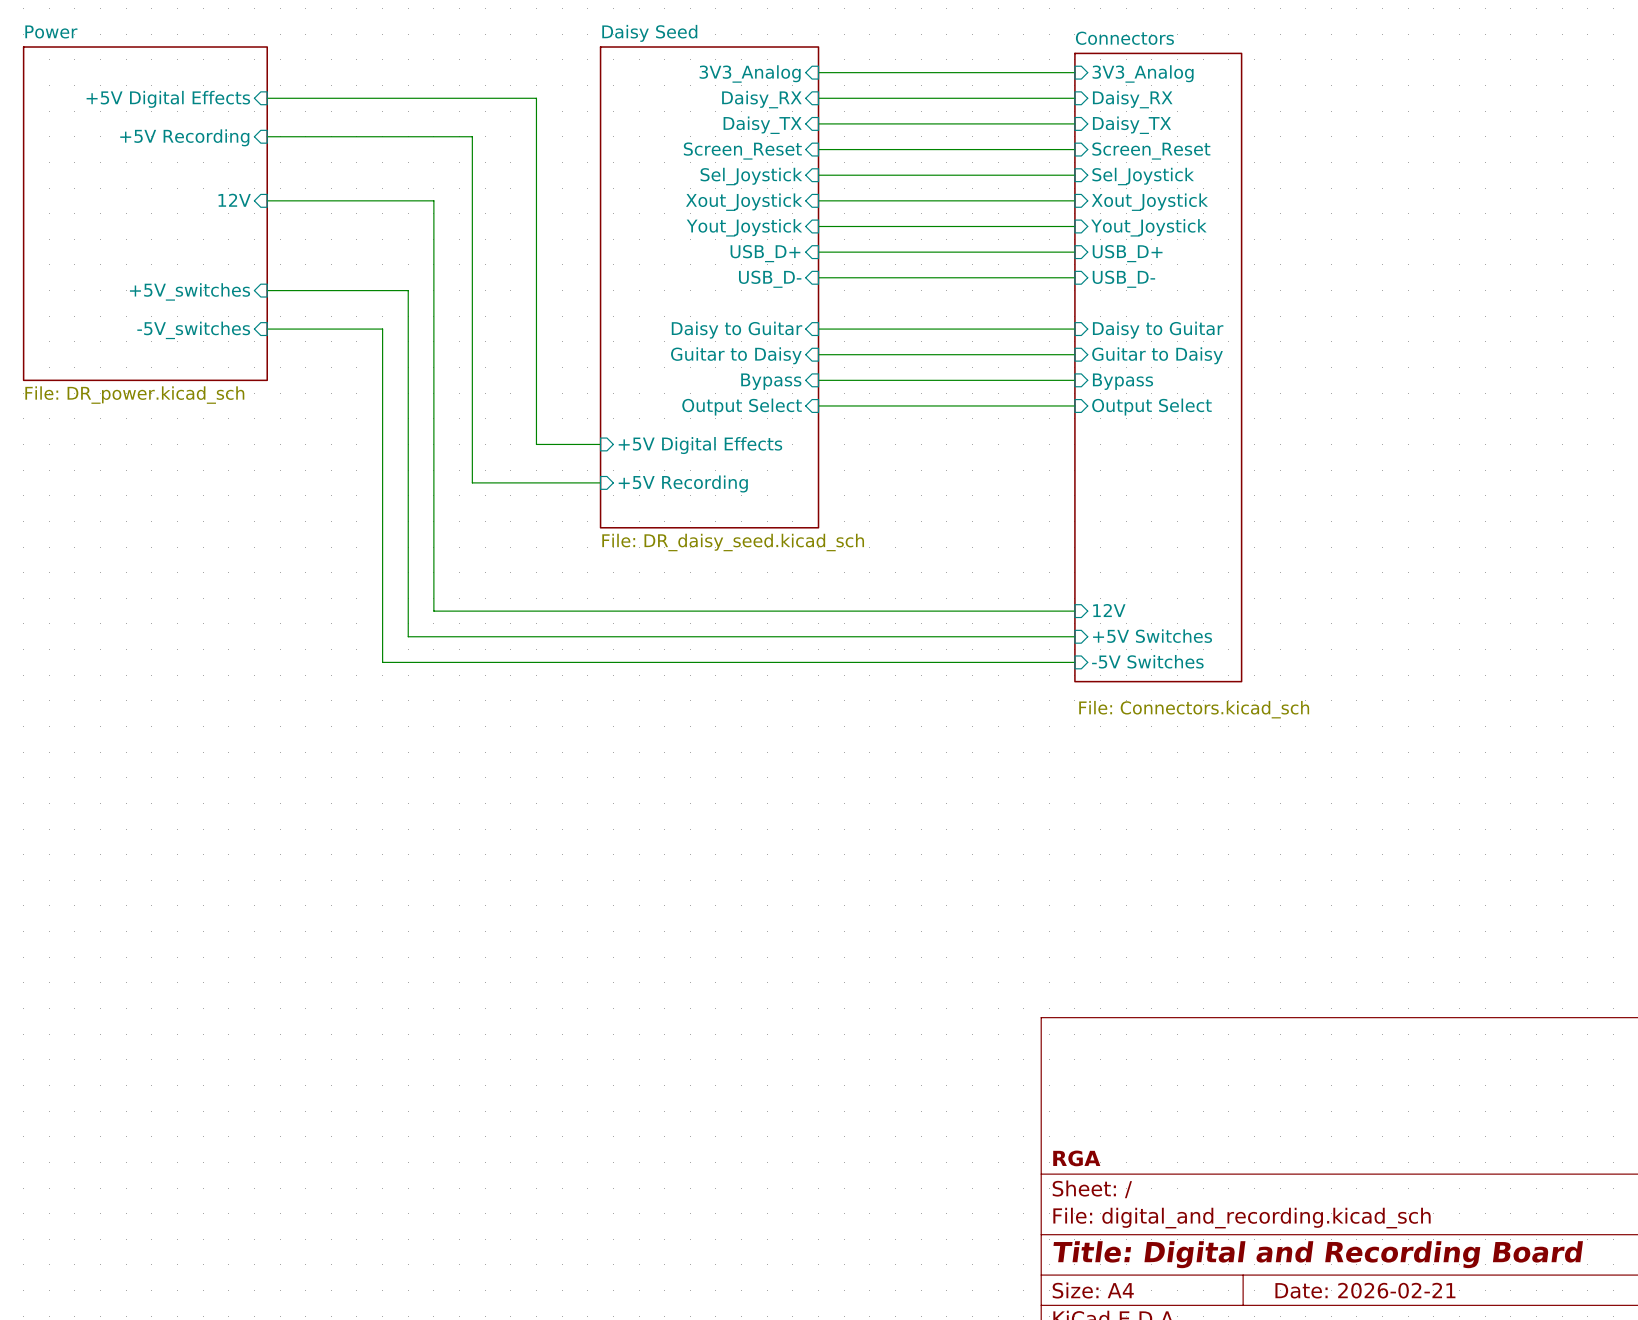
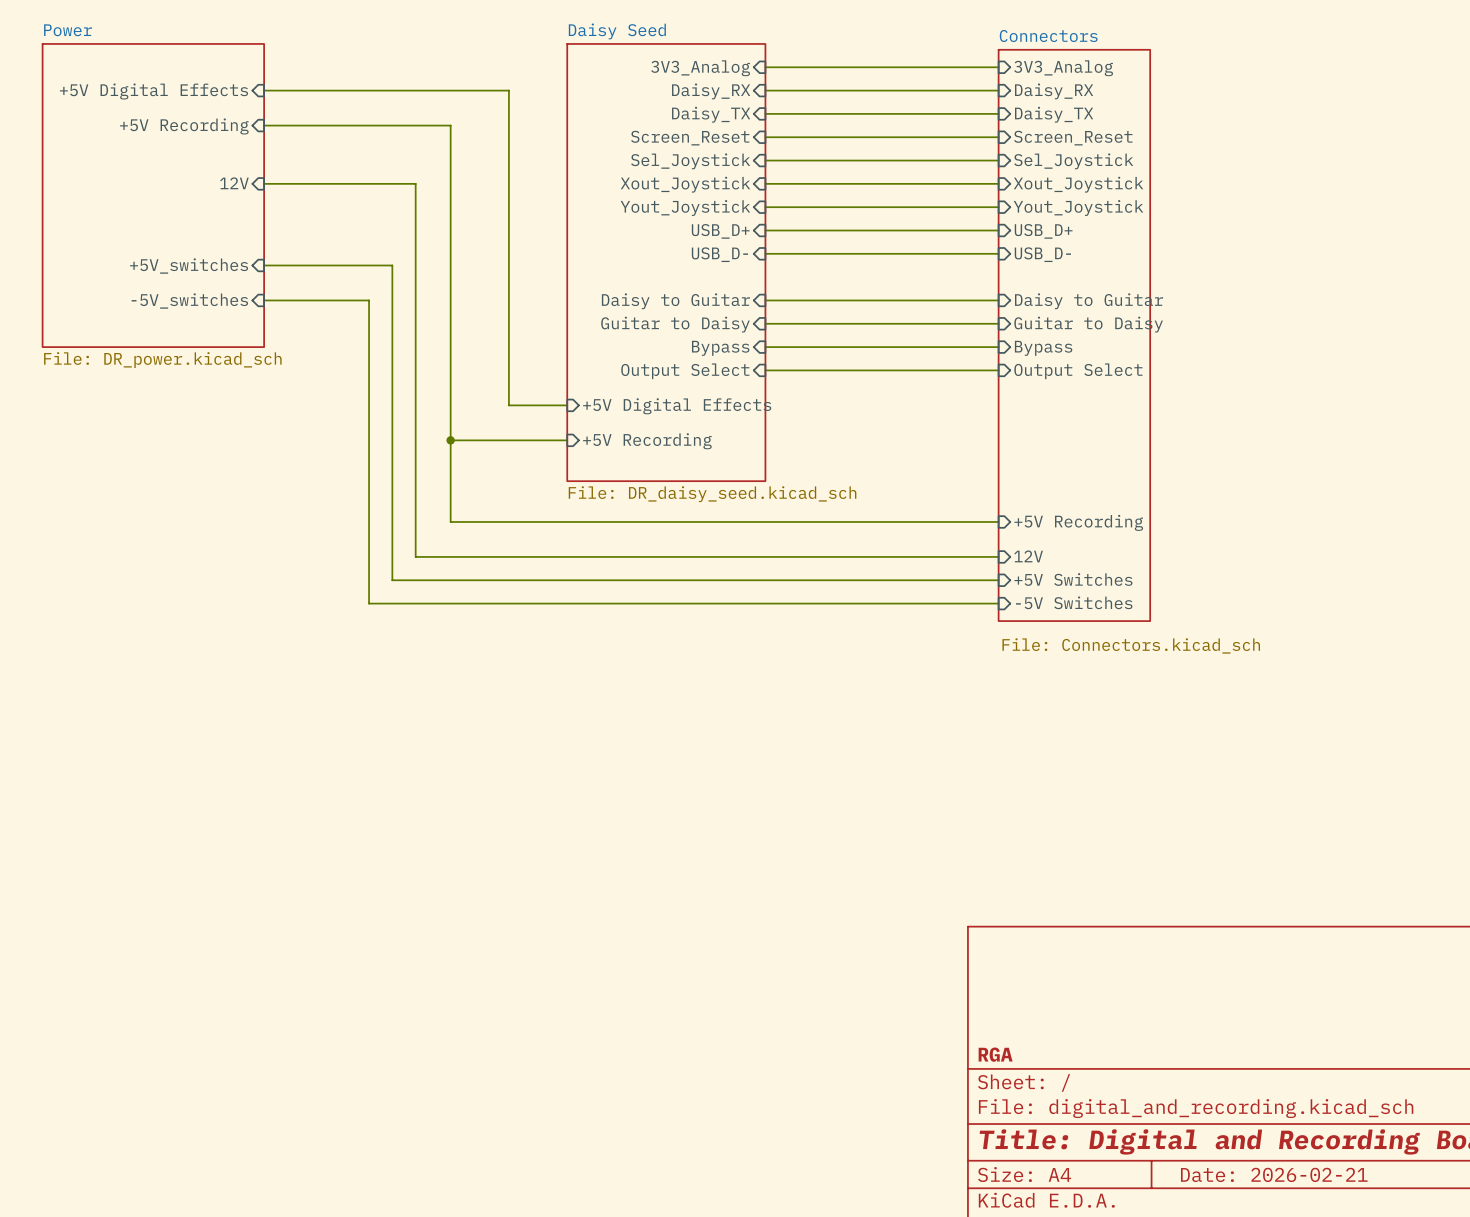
wire: none -> (450, 440) (450, 521) (998, 521)
junction: none -> (450, 440)
sheet pin: none -> +5V Recording (1078, 522)

